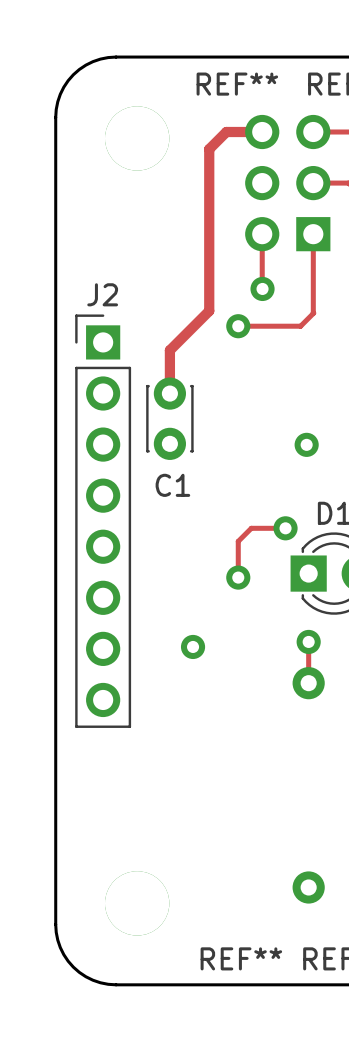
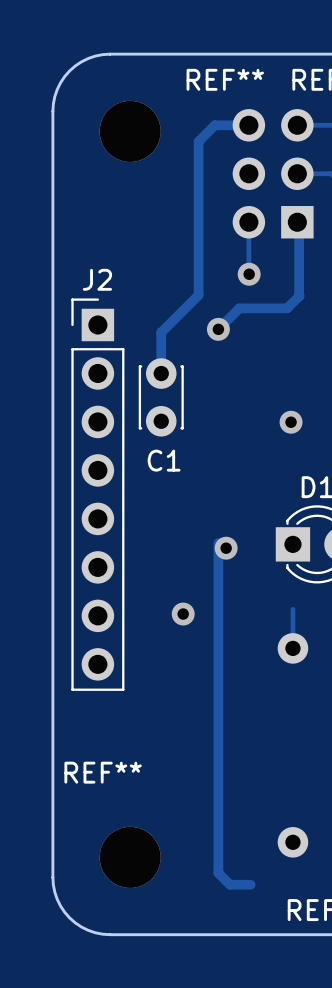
track: none -> (299, 220) (299, 295) (287, 308) (239, 308) (218, 329)
track: (313, 234) (313, 313) (300, 326) (238, 326) -> none
via position: (238, 326) -> (218, 329)
track: (285, 528) (251, 528) (238, 541) (238, 577) -> none
via: (285, 528) -> none
track: none -> (218, 543) (218, 873) (229, 884) (250, 884)
via: (308, 641) -> none
REF** name position: REF** (241, 958) -> REF** (103, 772)

